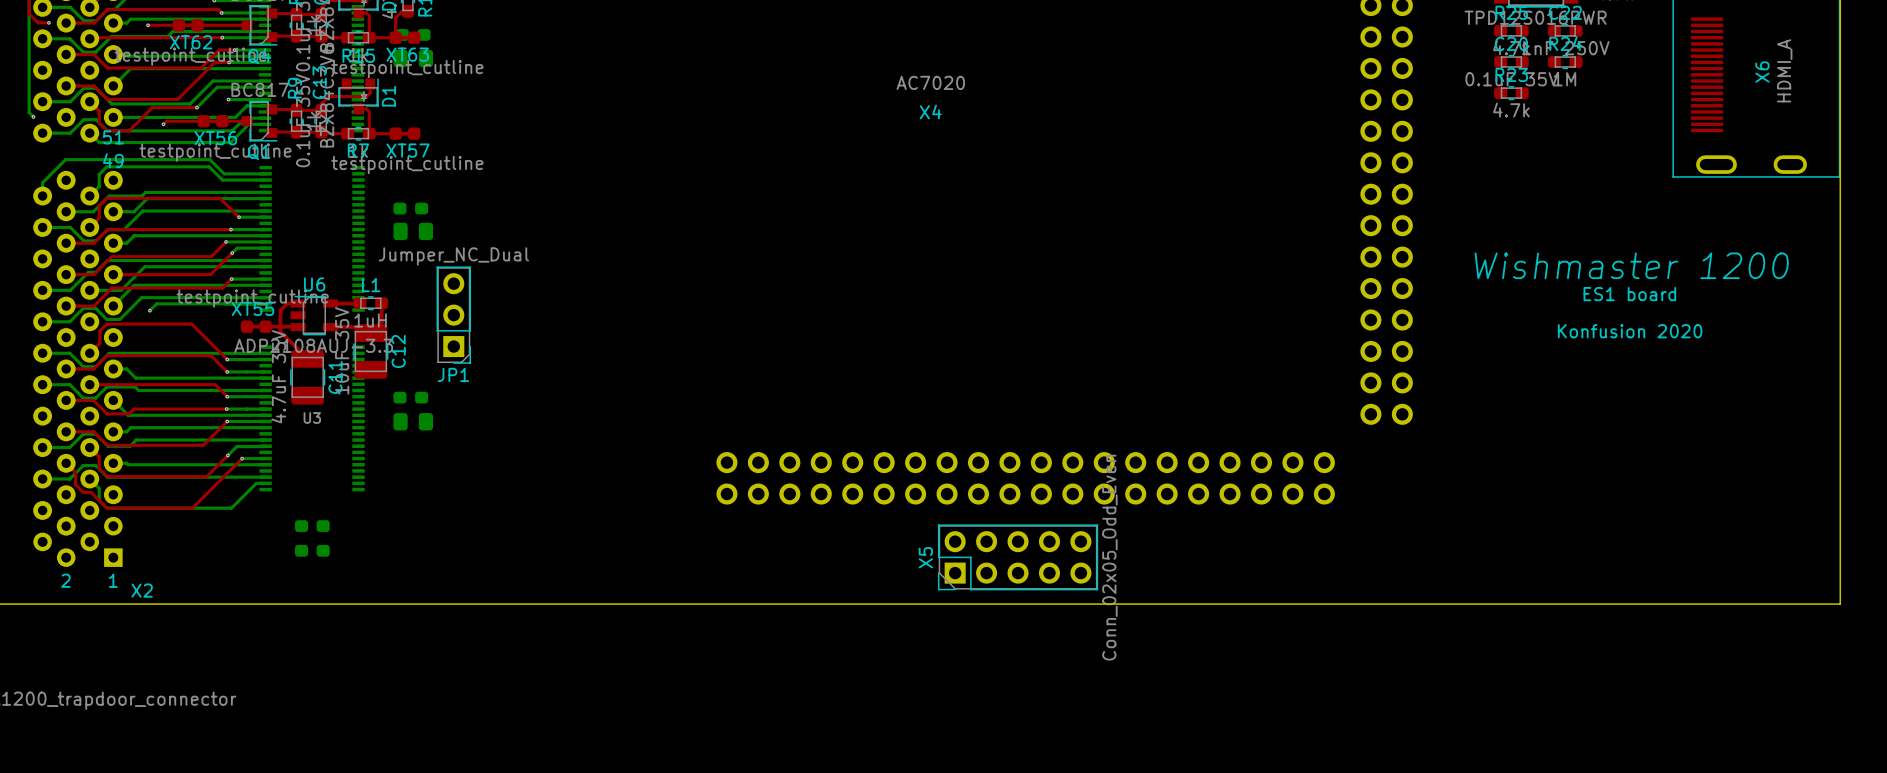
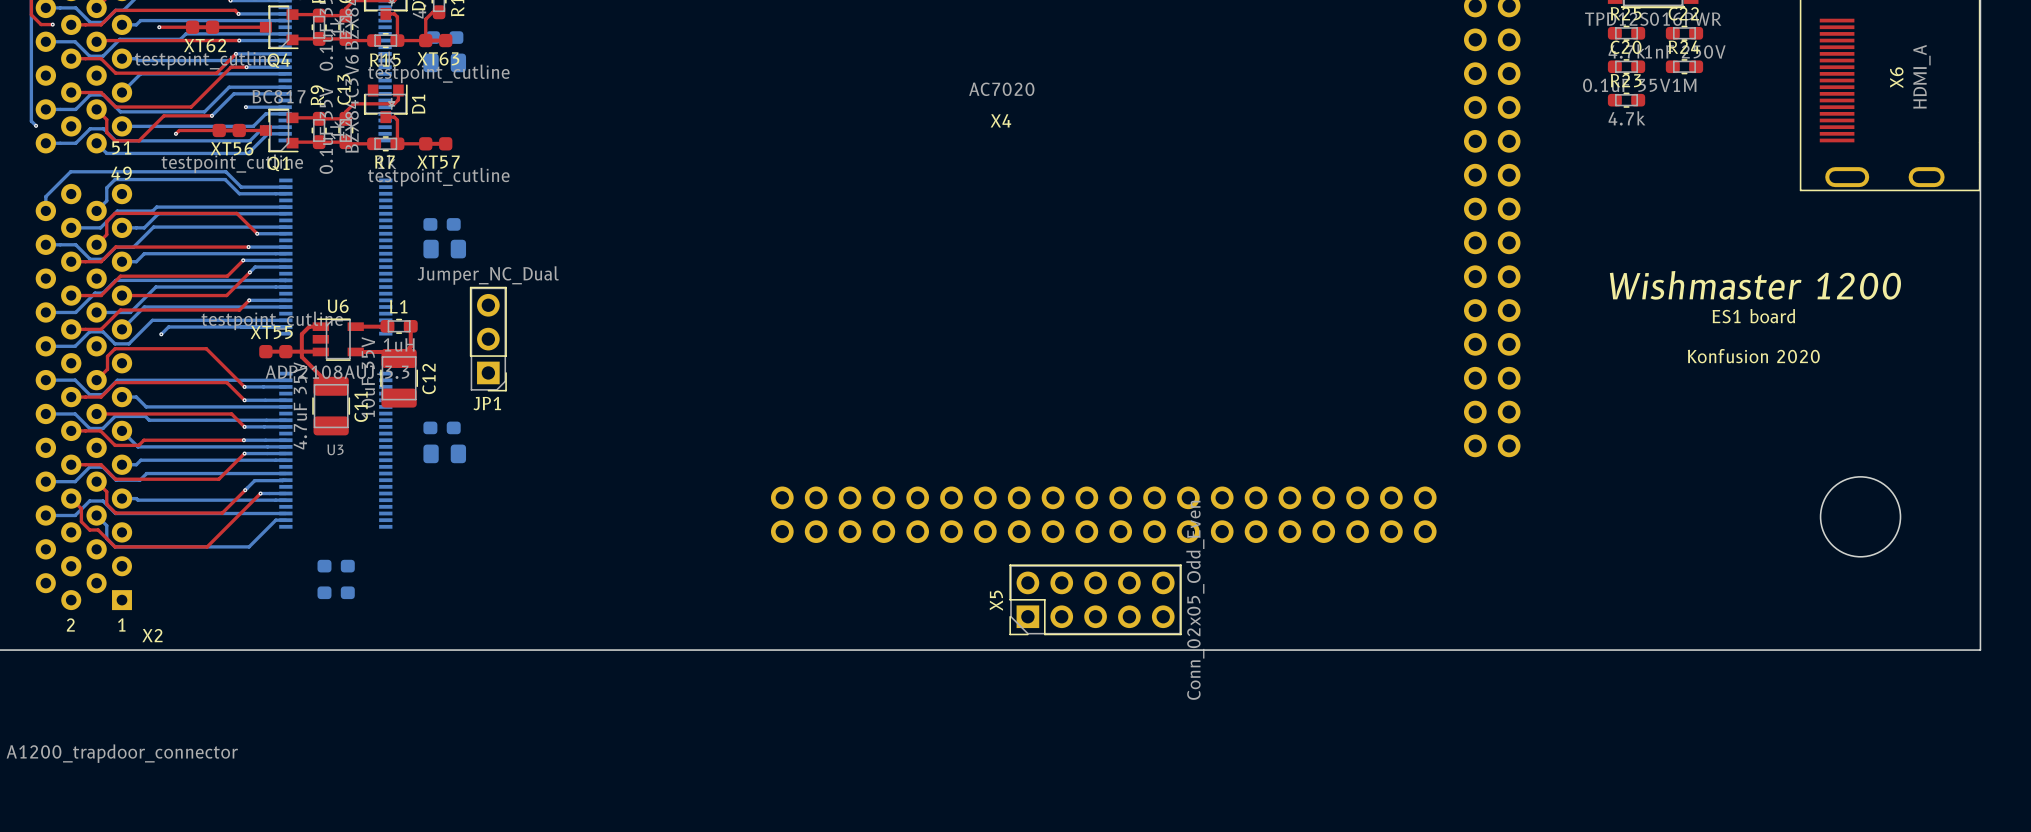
top track: (219, 50) (234, 50) -> none
bottom track: none -> (235, 53) (252, 53)
via position: (234, 50) -> (235, 53)
round board edge: none -> [1819, 476, 1902, 558]

